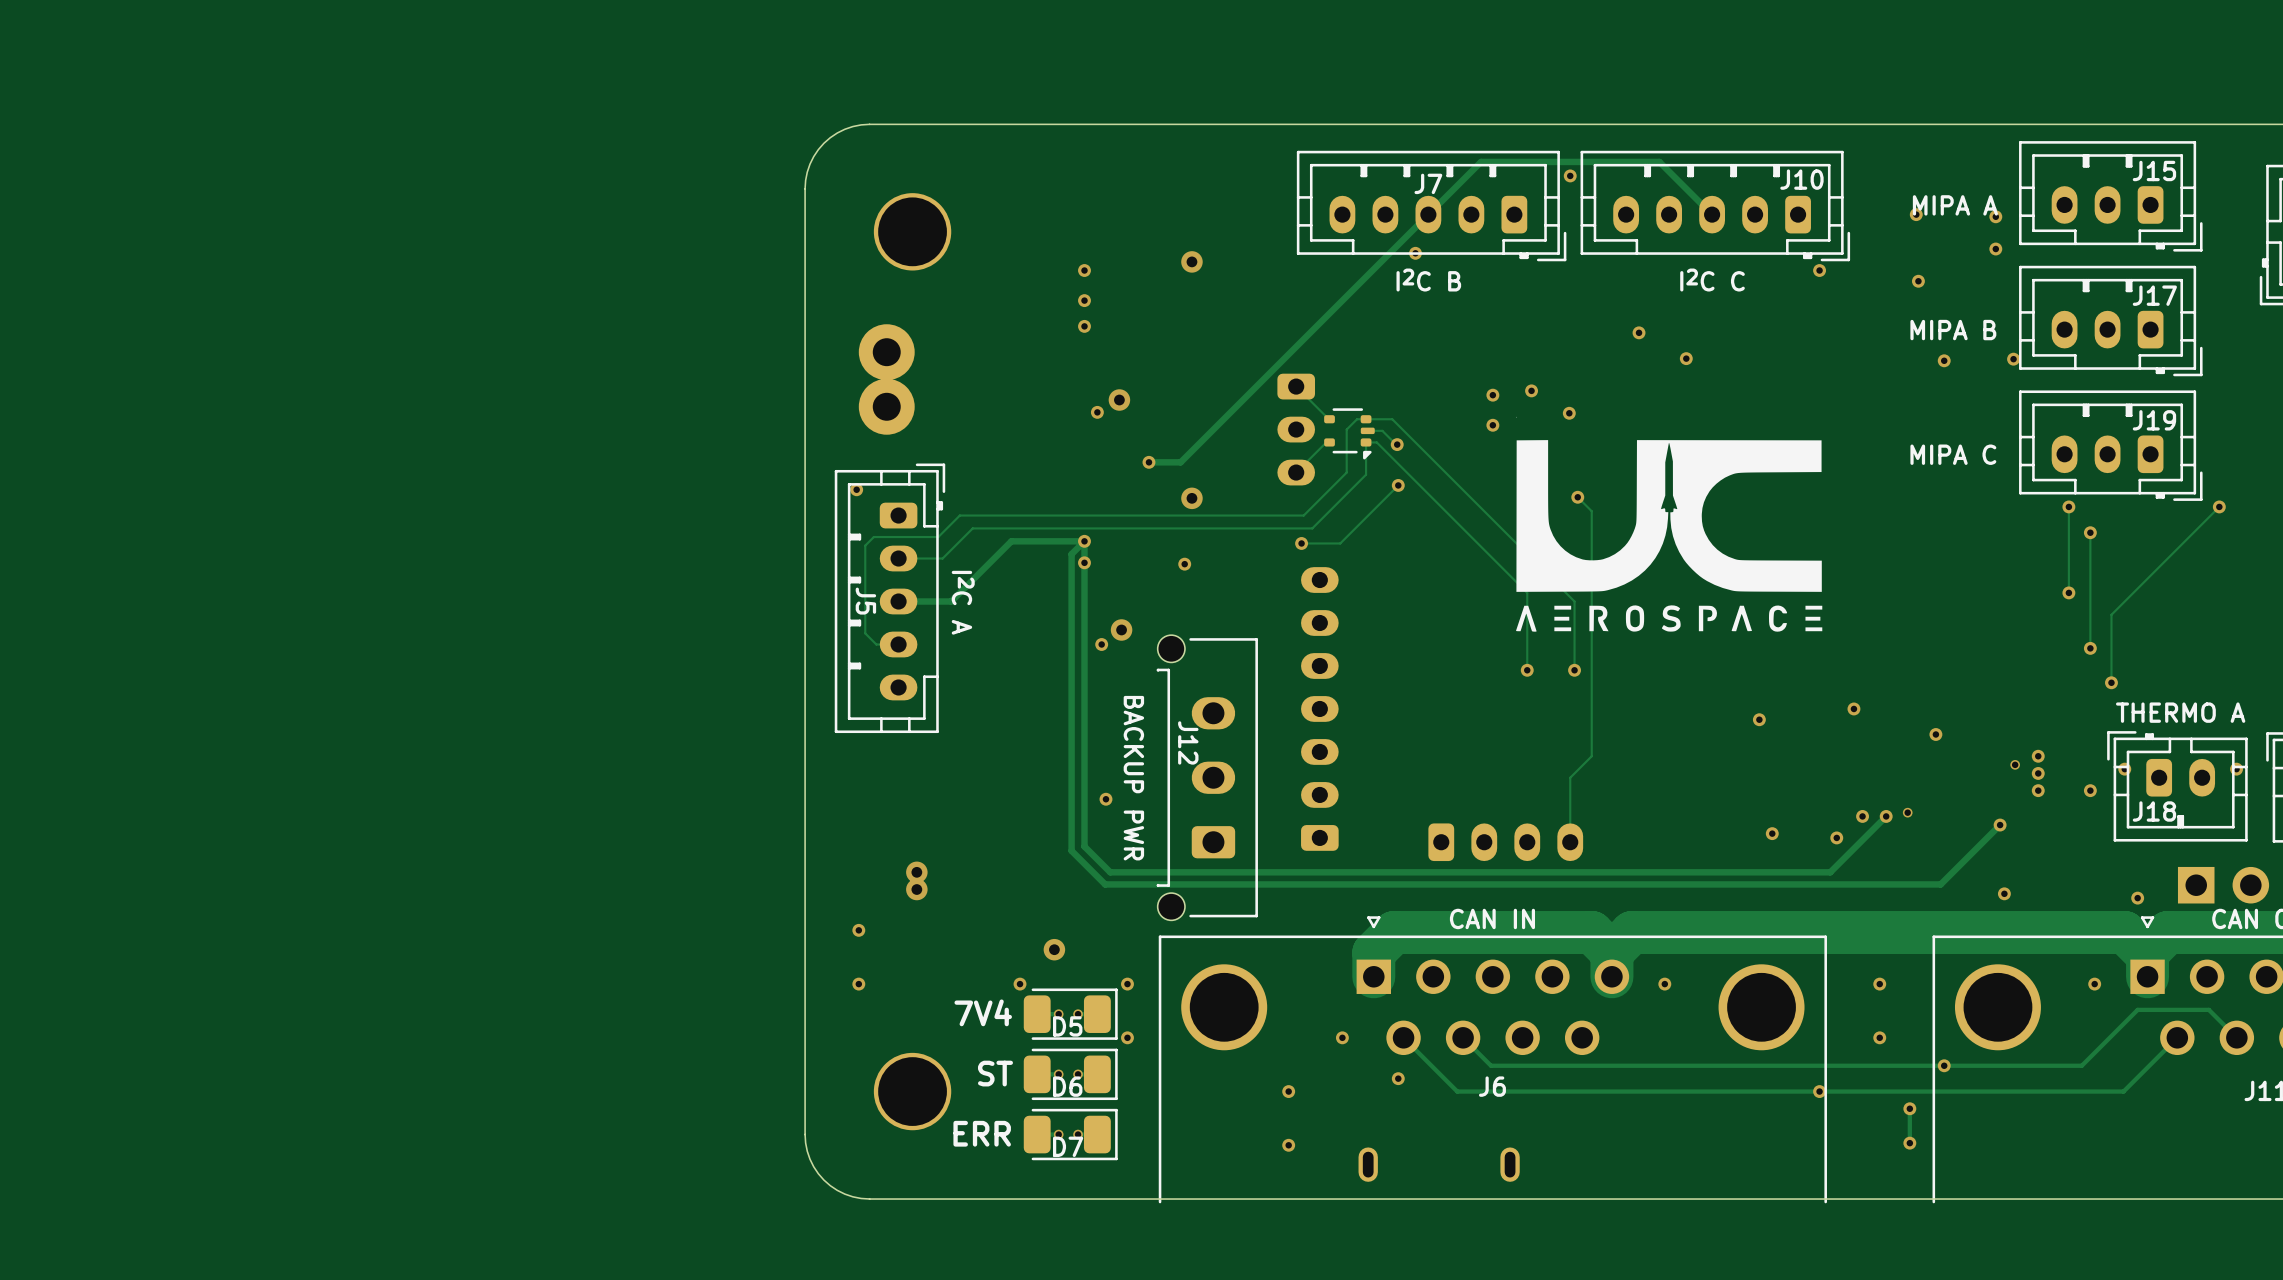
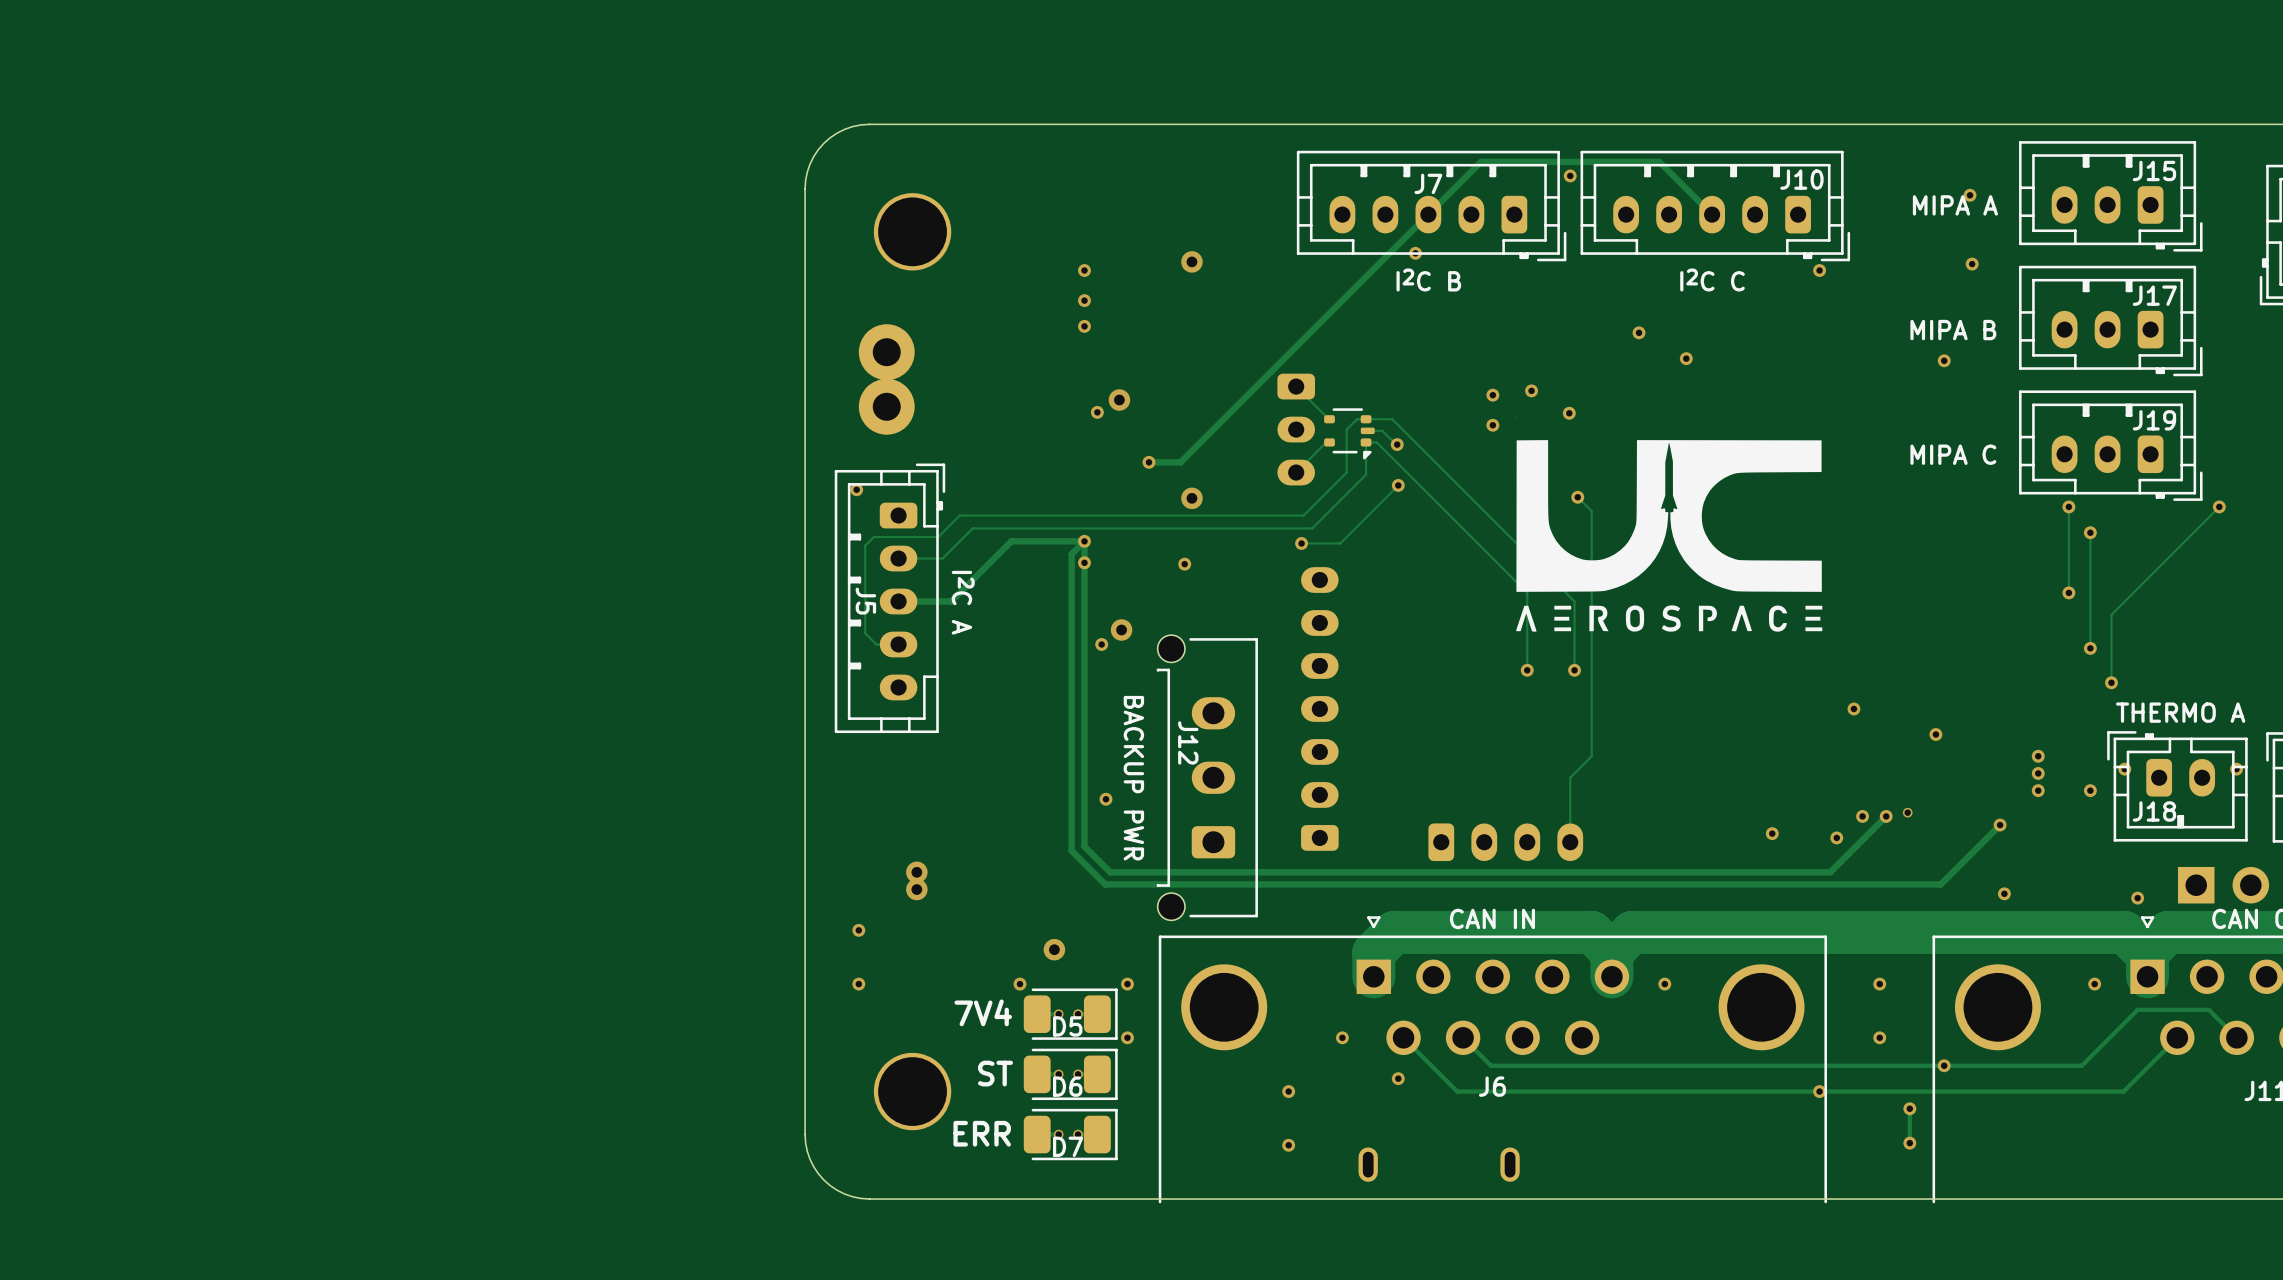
via: none -> (1970, 195)
via: (1916, 214) -> none
via: (1995, 216) -> none
via: (1995, 249) -> none
via: none -> (1972, 264)
via: (1918, 281) -> none
via: (2013, 359) -> none
via: (1759, 719) -> none
via: (2015, 764) -> none

